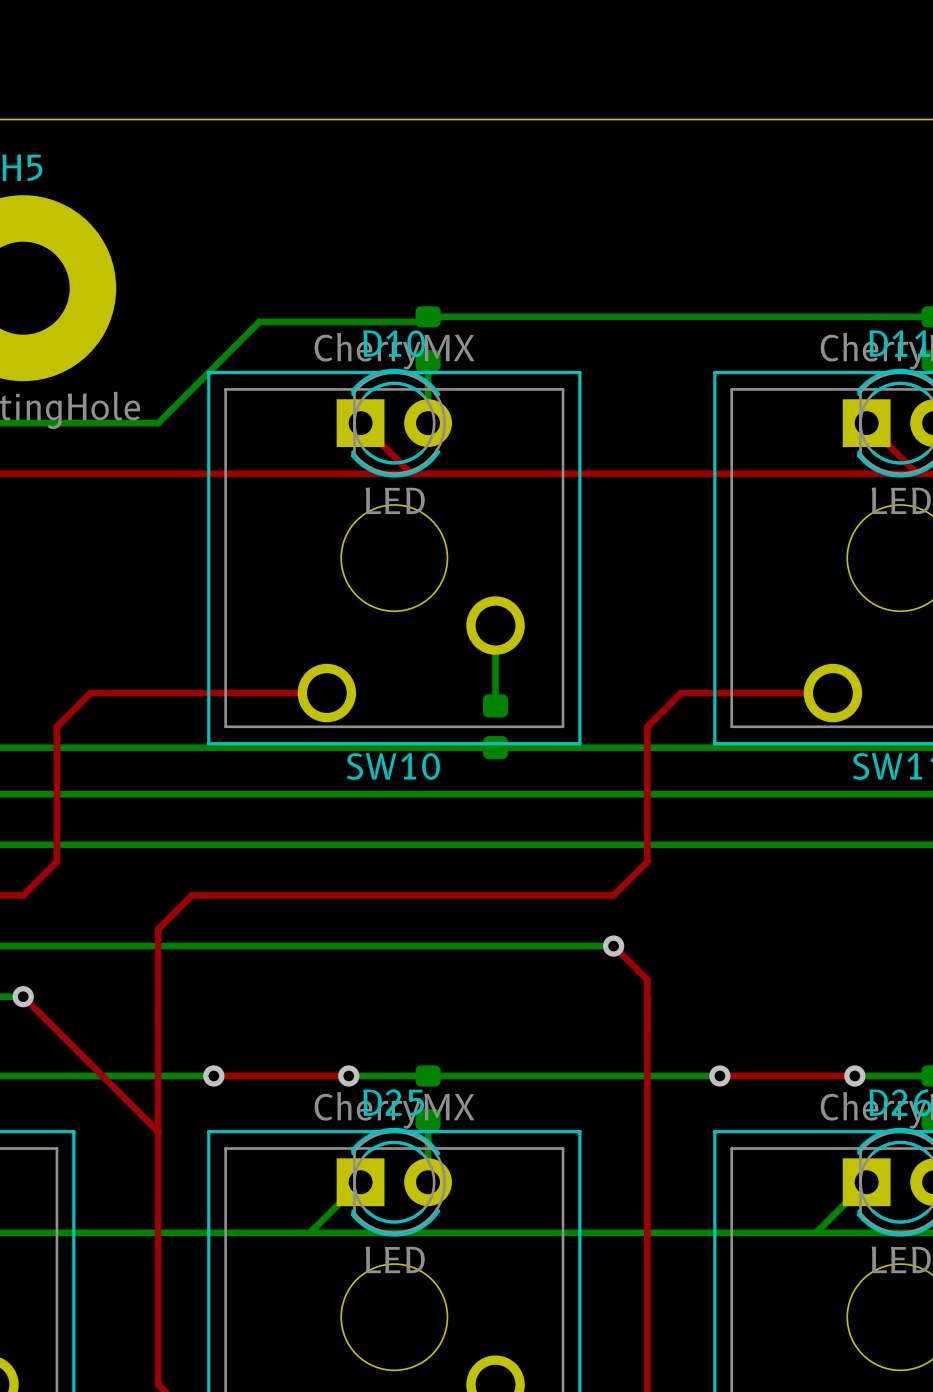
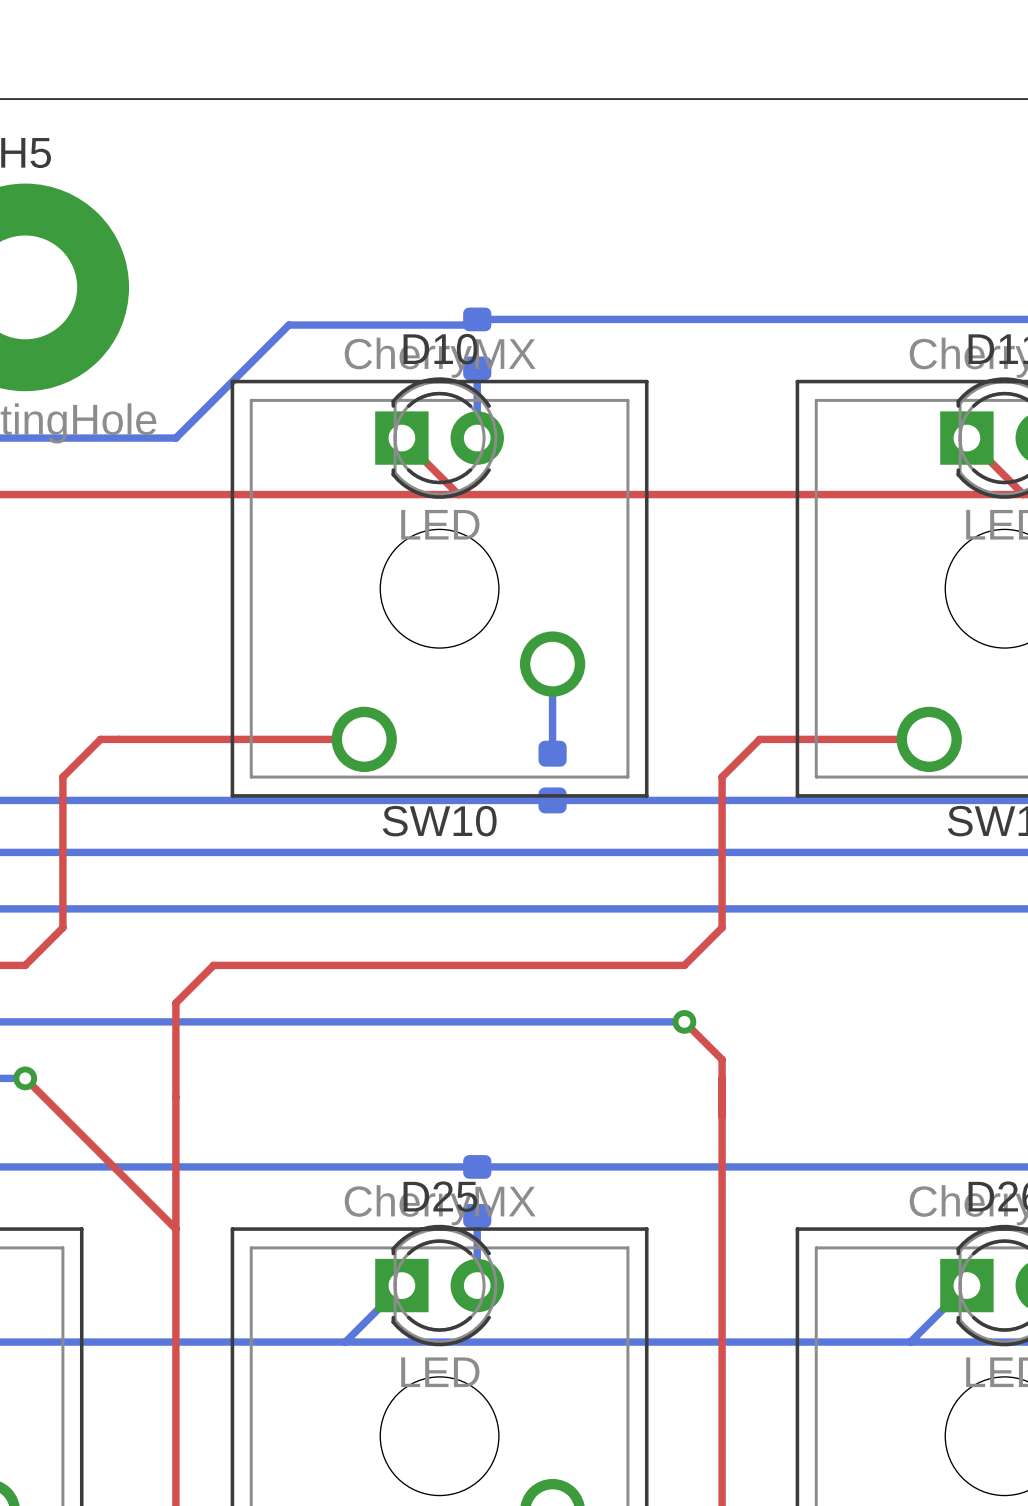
bottom track: none -> (238, 1166) (388, 1166)
top track: (213, 1075) (348, 1075) -> none
via: (213, 1075) -> none
via: (348, 1075) -> none
bottom track: none -> (803, 1166) (953, 1166)
top track: (719, 1075) (854, 1075) -> none
via: (719, 1075) -> none
via: (854, 1075) -> none

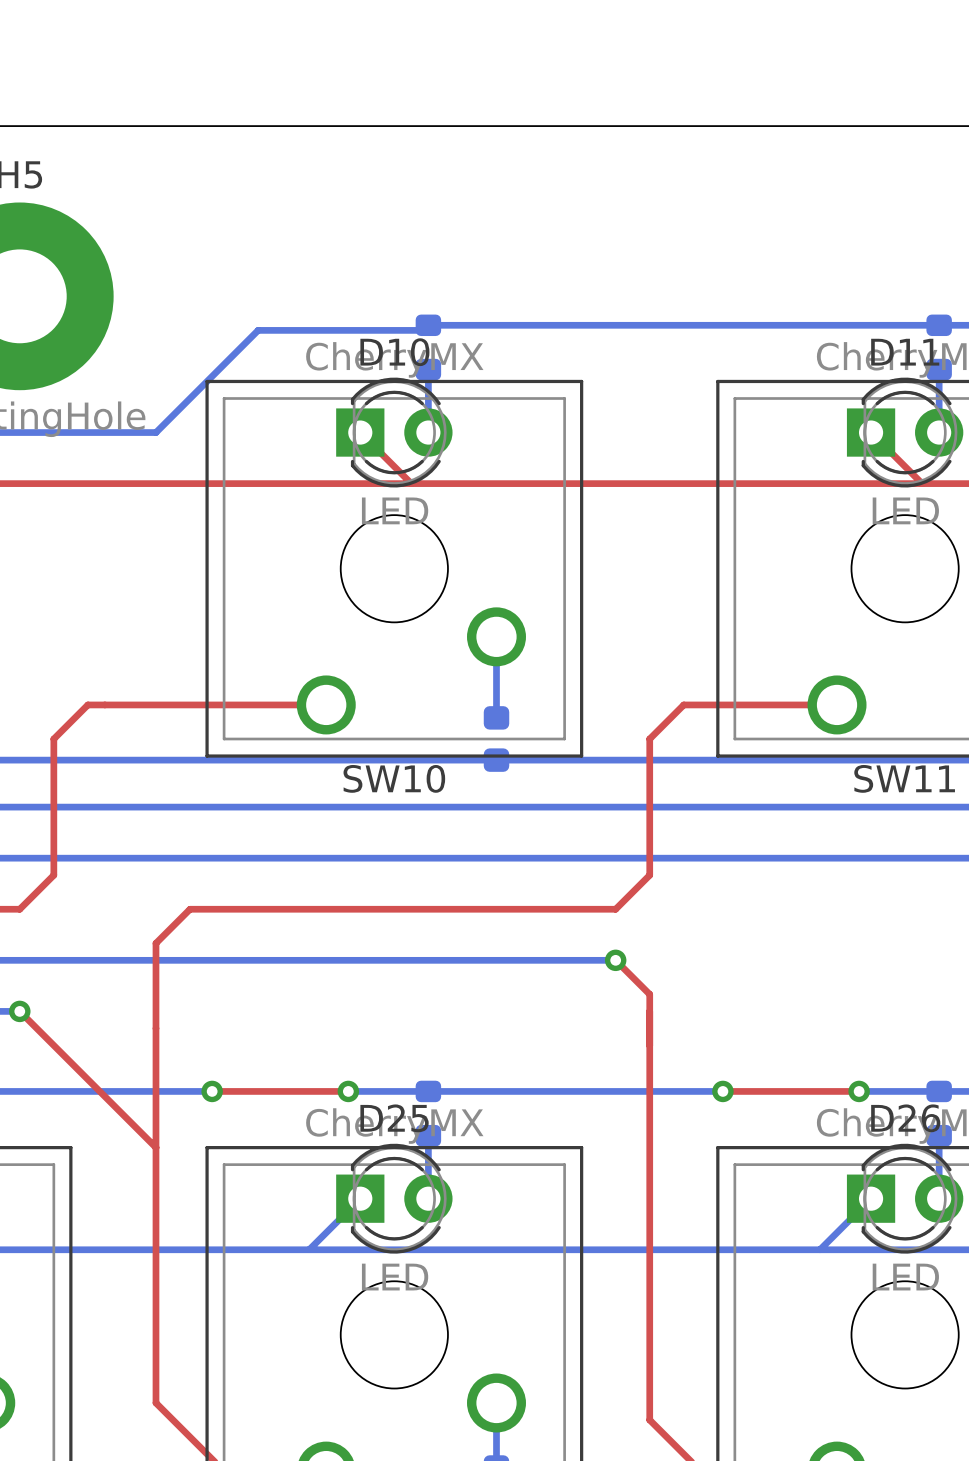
bottom track: (238, 1166) (388, 1166) -> none
top track: none -> (212, 1091) (348, 1091)
via: none -> (212, 1091)
via: none -> (348, 1091)
bottom track: (803, 1166) (953, 1166) -> none
top track: none -> (722, 1091) (859, 1091)
via: none -> (722, 1091)
via: none -> (859, 1091)

